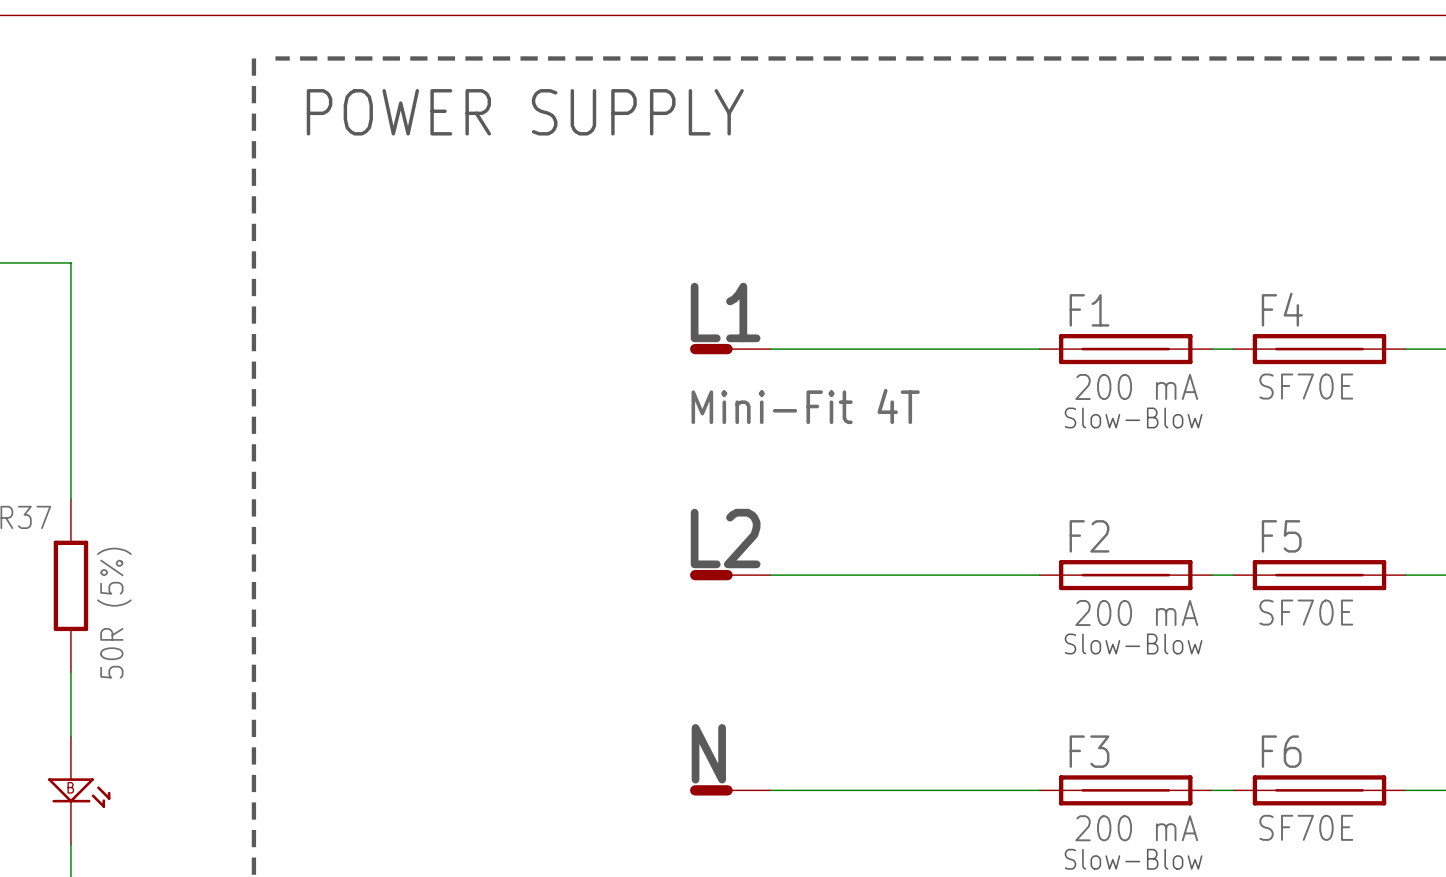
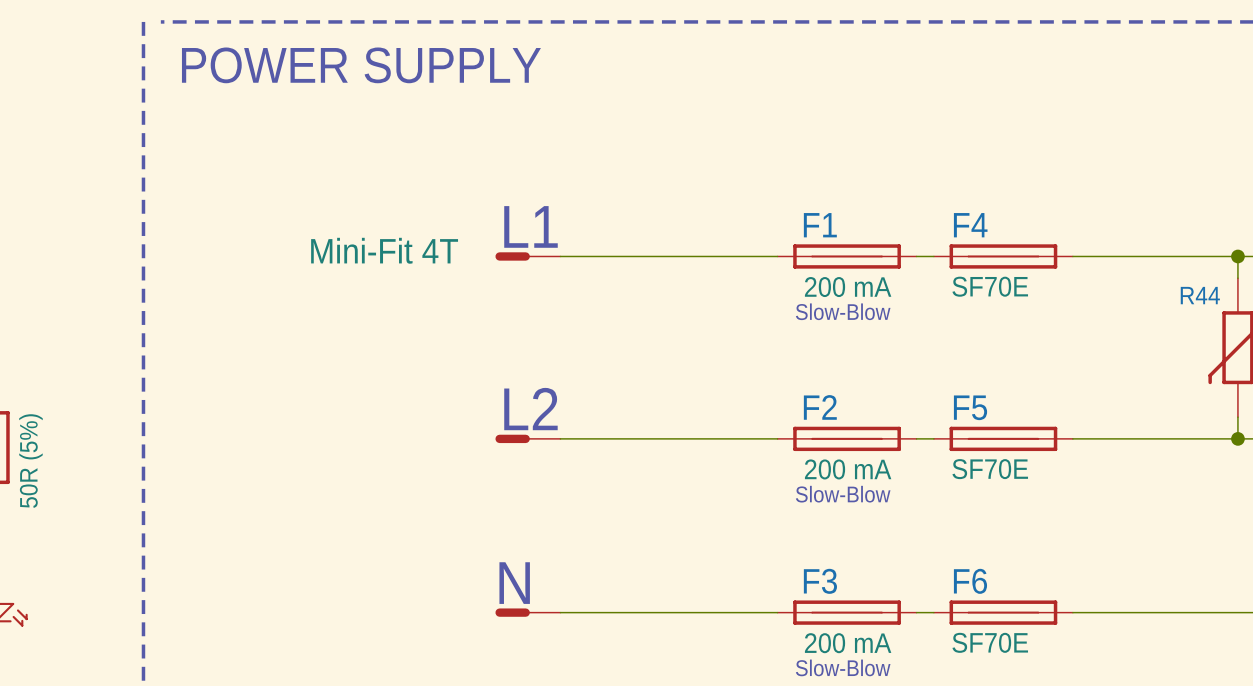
part value position: Mini-Fit 4T (805, 406) -> Mini-Fit 4T (384, 250)

